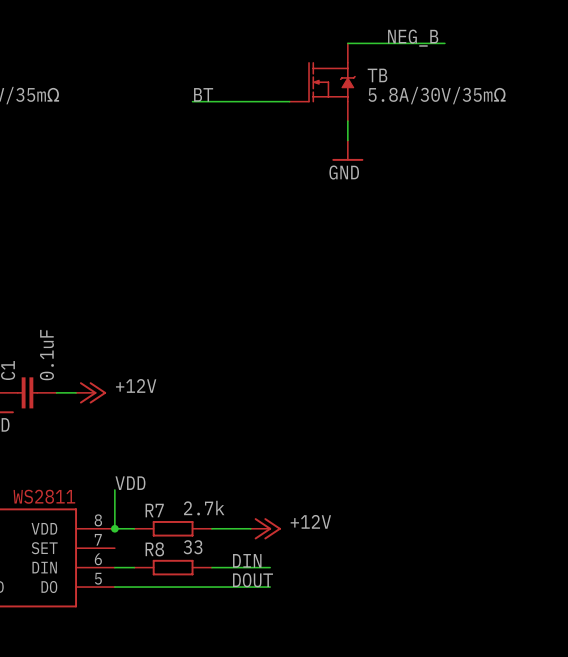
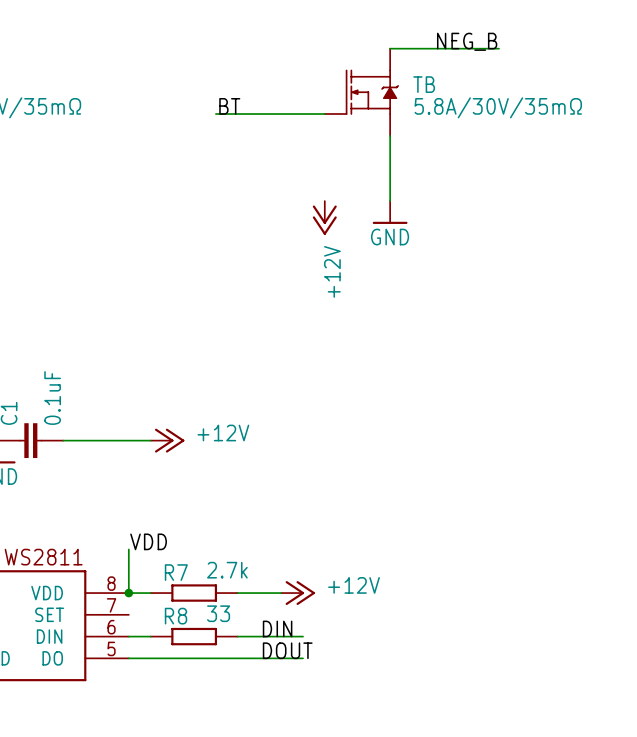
power symbol position: GND (347, 150) -> GND (390, 212)
power symbol: none -> +12V (324, 217)
wire: none -> (85, 440) (150, 440)
power symbol position: +12V (91, 392) -> +12V (167, 440)

